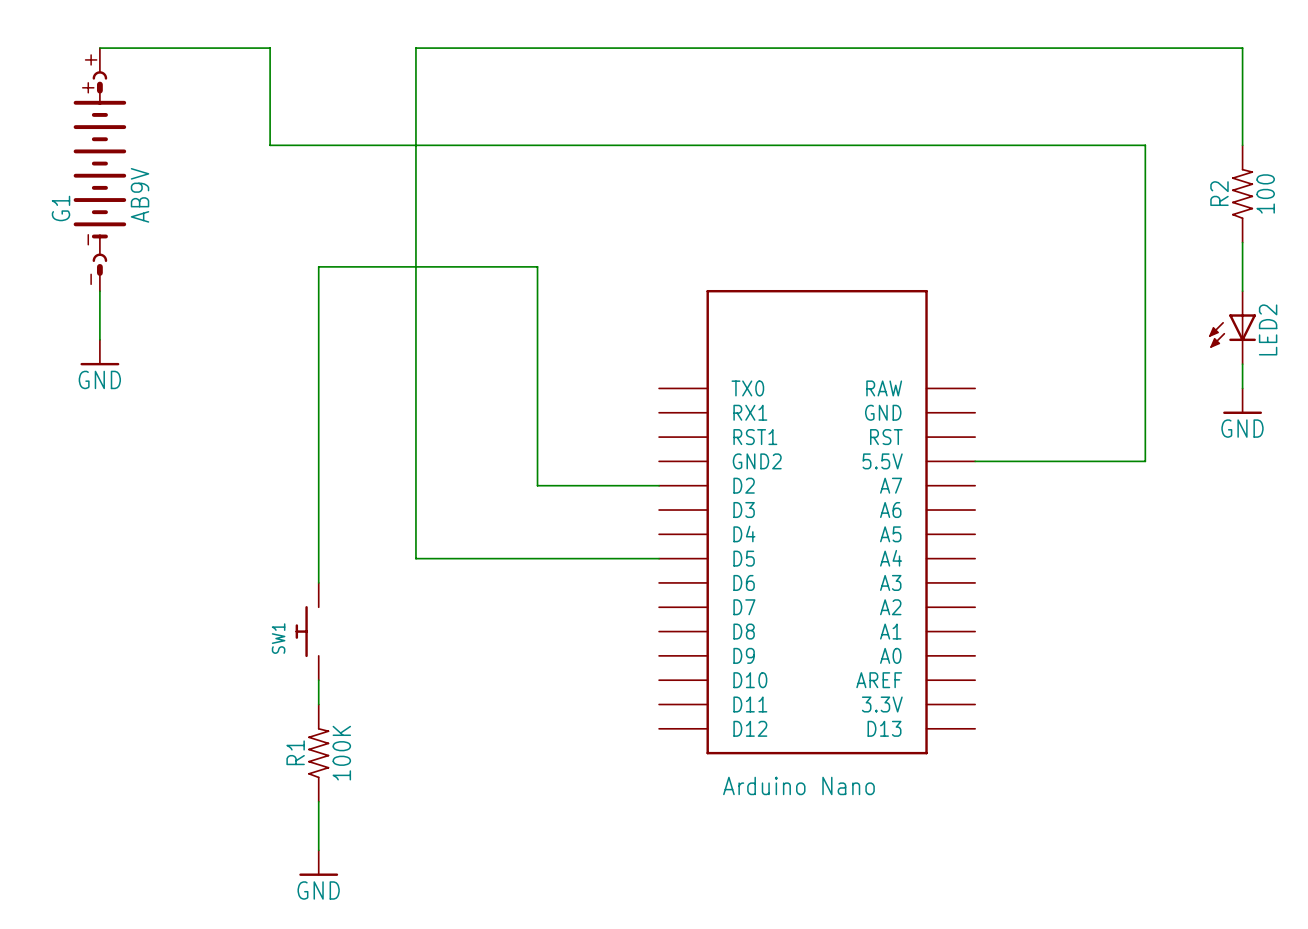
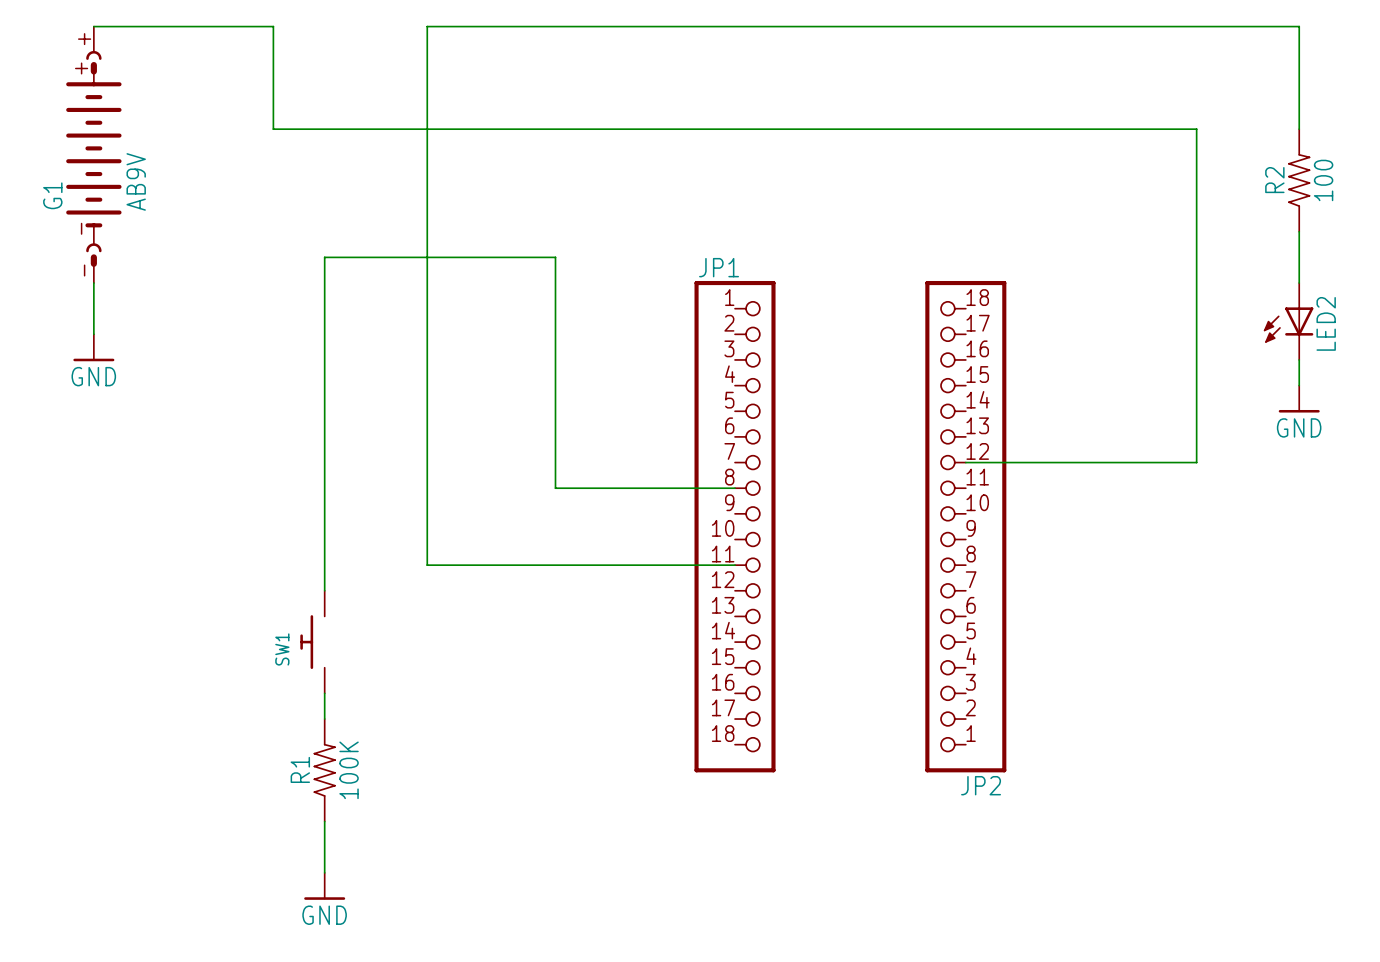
JP1: none -> (735, 526)
part: (817, 522) -> none
JP2: none -> (965, 526)

